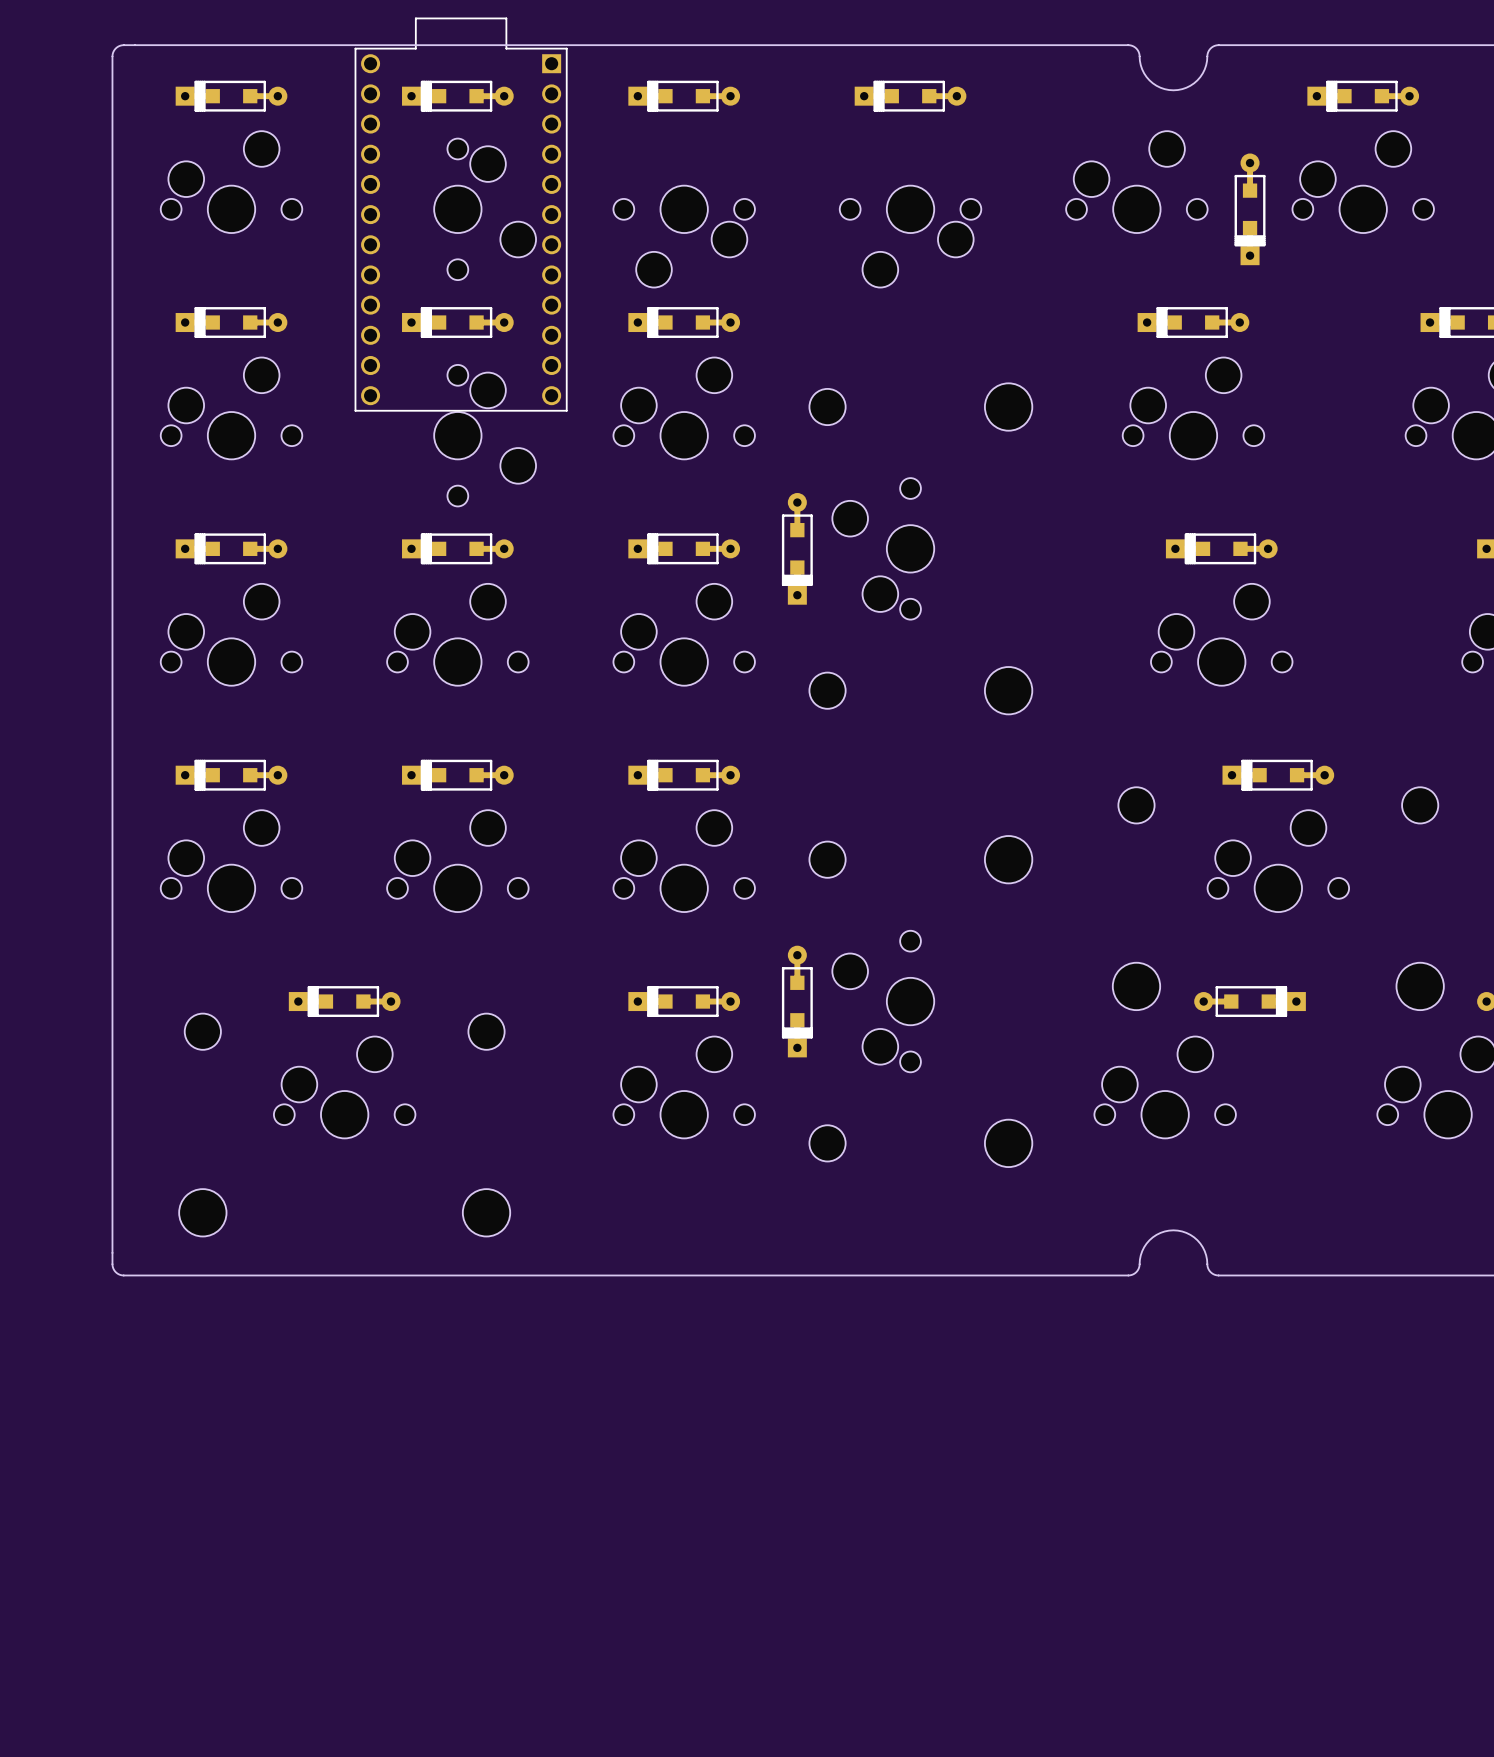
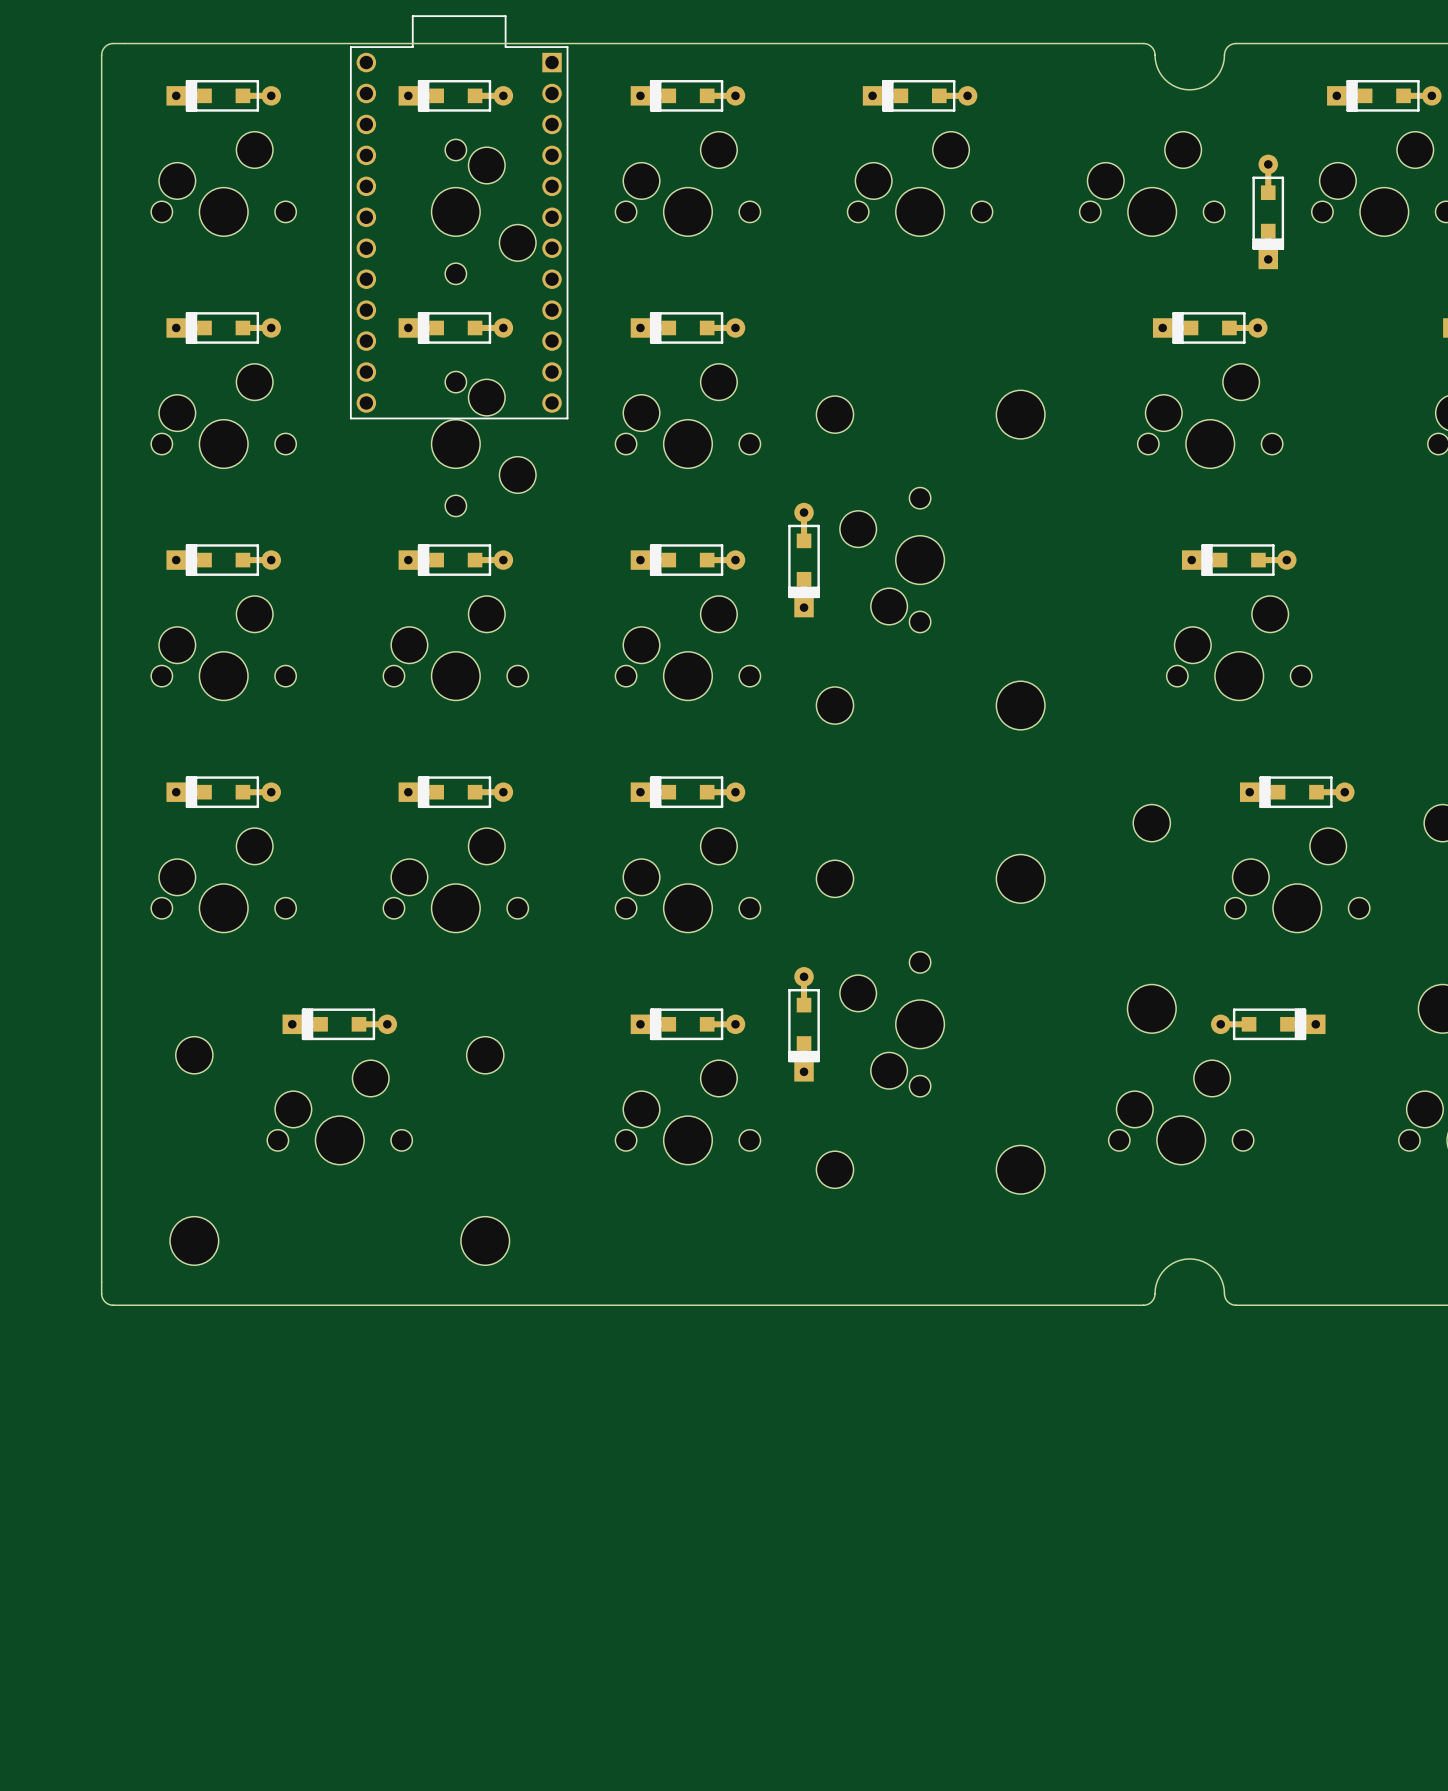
part rotation: 0° (684, 236) -> 180° (687, 183)
part rotation: 0° (910, 236) -> 180° (920, 183)

